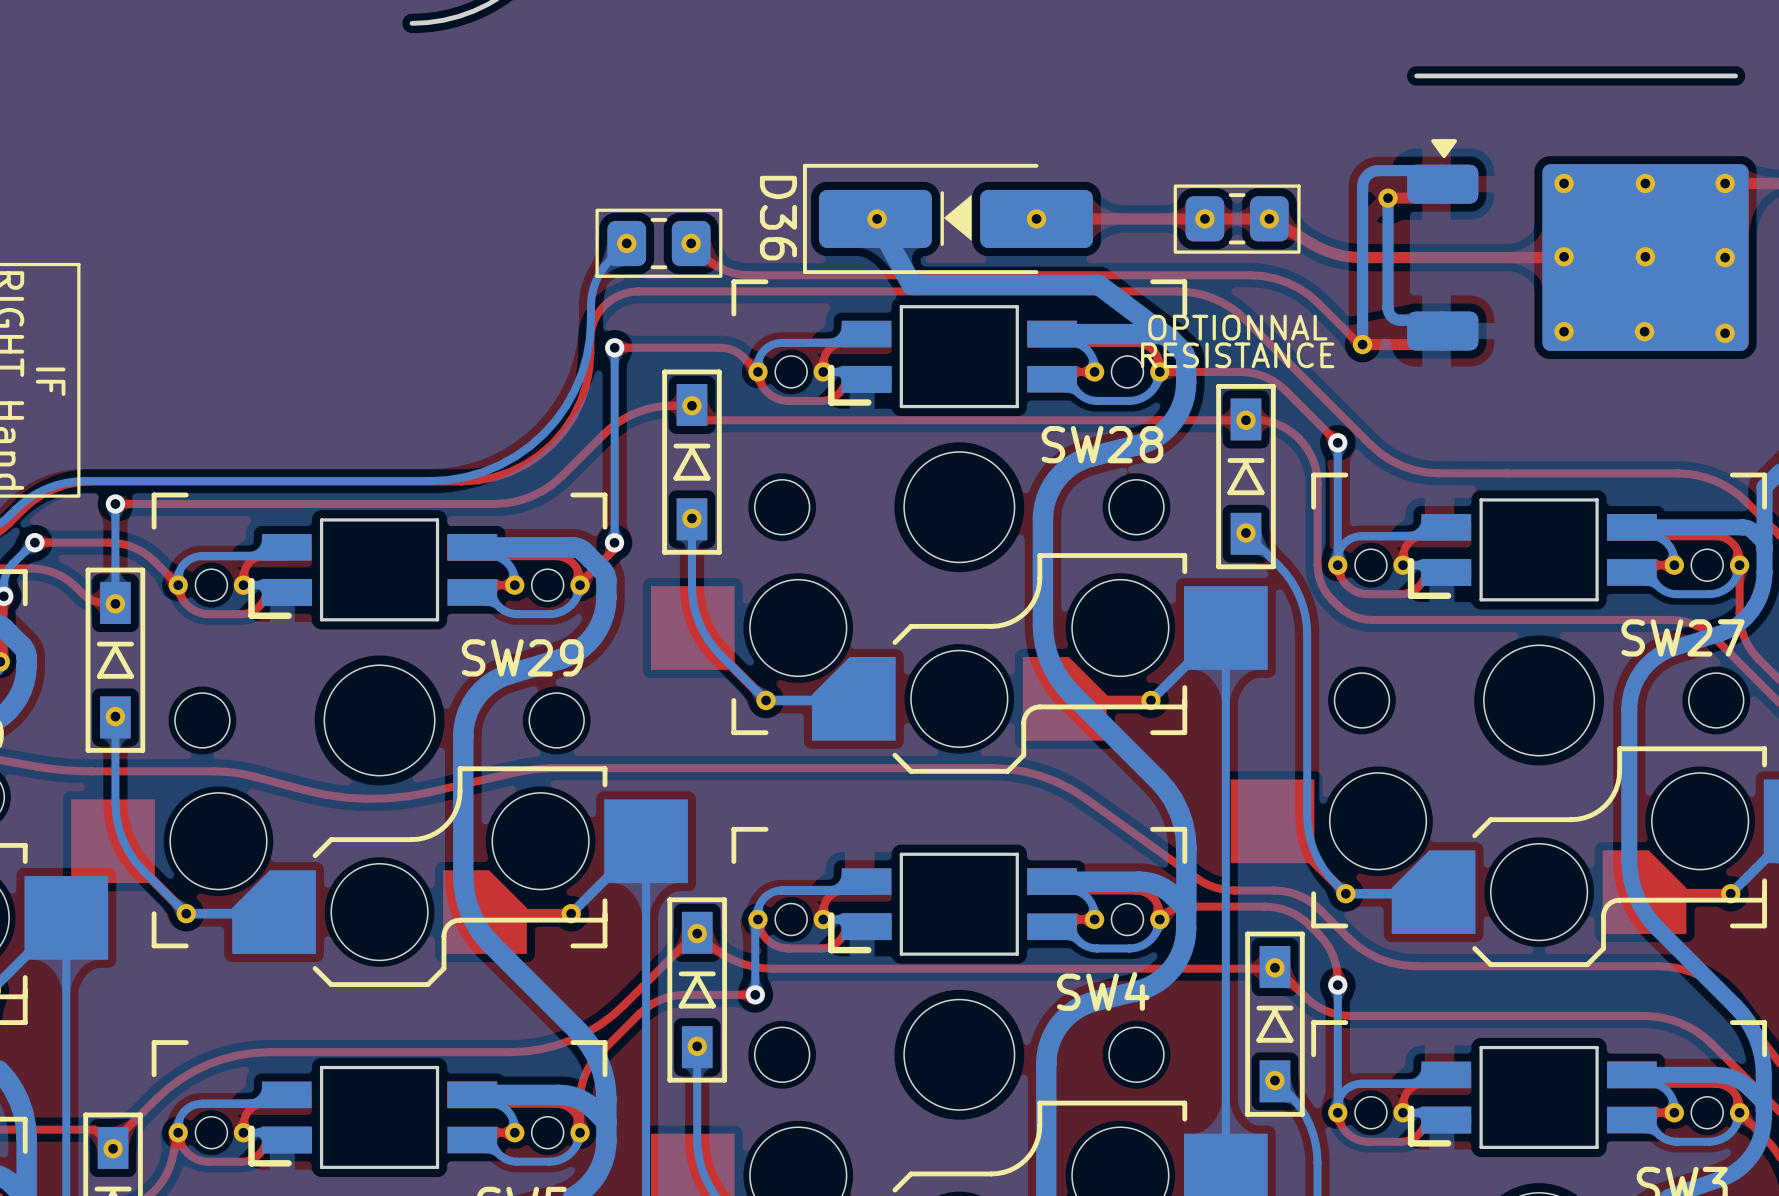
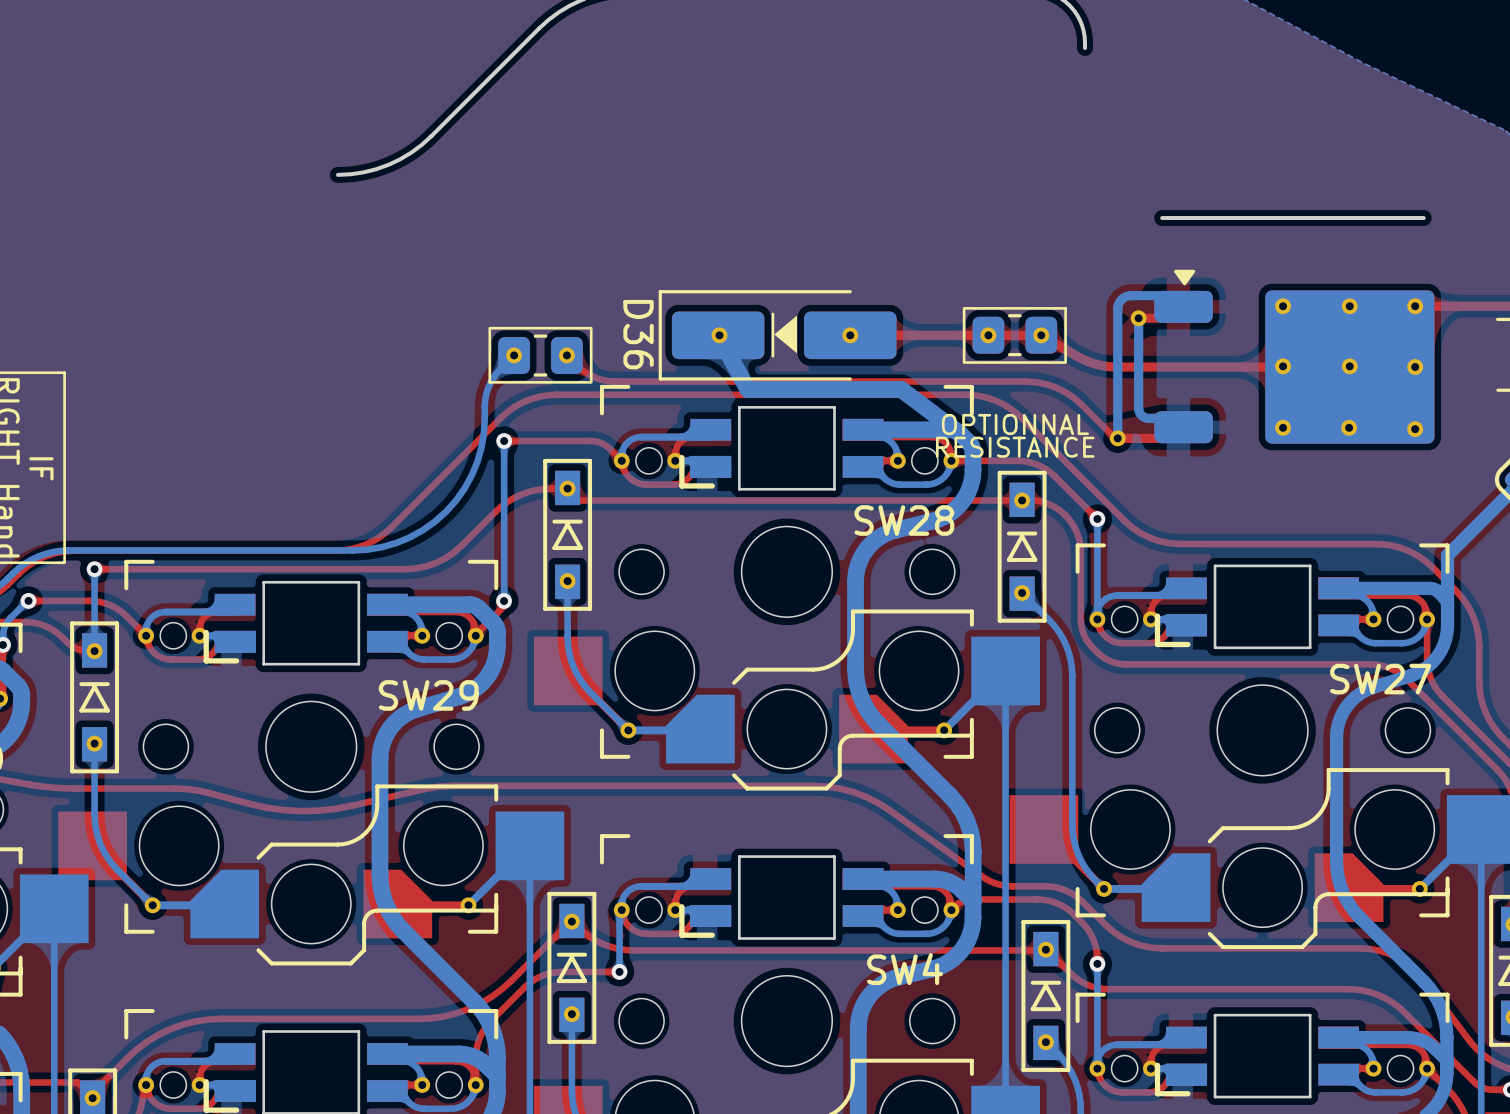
top track: (678, 291) (626, 293) (609, 301) (600, 310) (592, 327) (589, 369) (580, 401) (563, 431) (539, 454) (525, 464) (494, 477) (461, 481) (408, 481) -> (556, 394) (533, 398) (512, 408) (385, 532) (365, 544) (350, 549) (335, 550)

